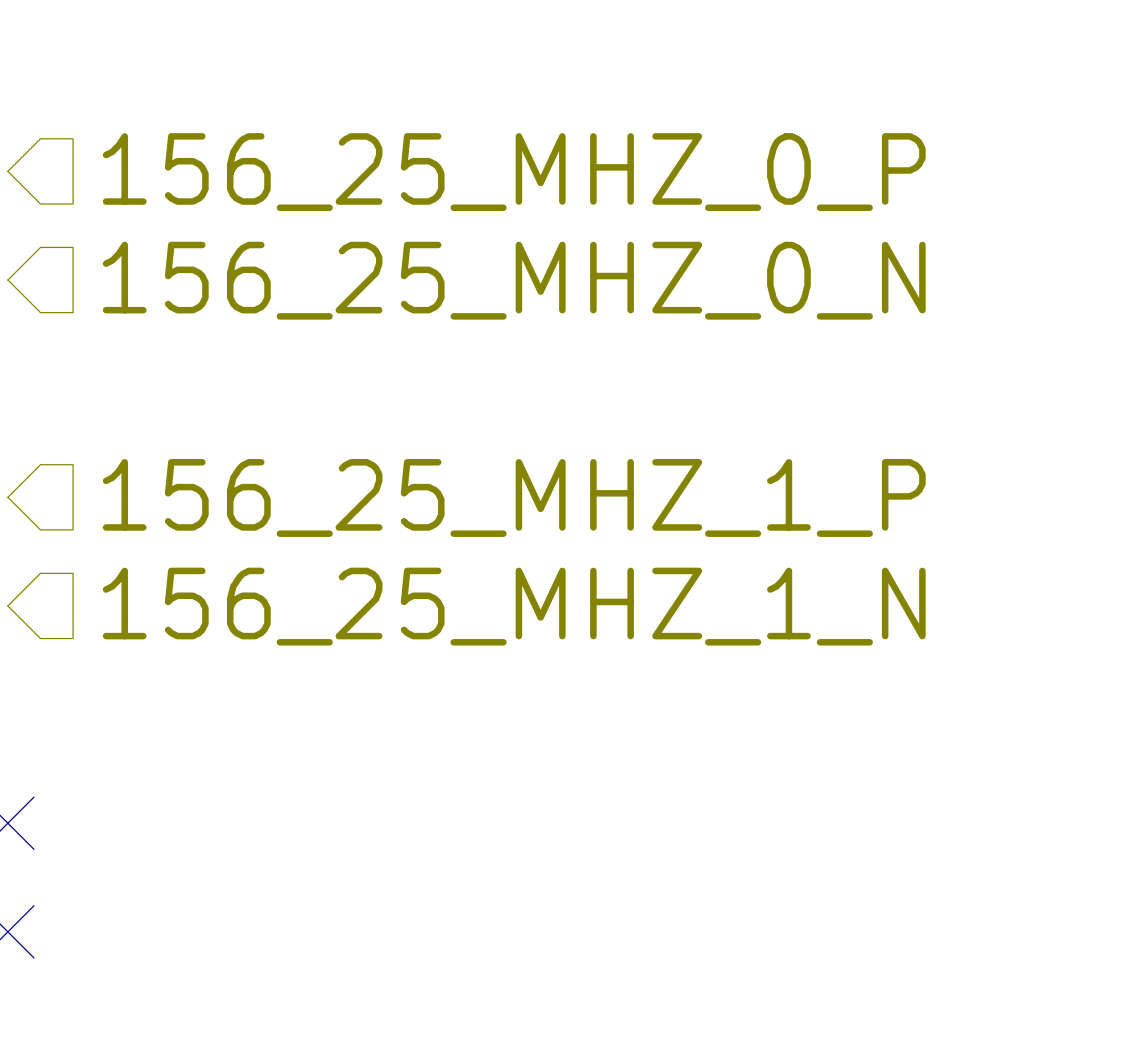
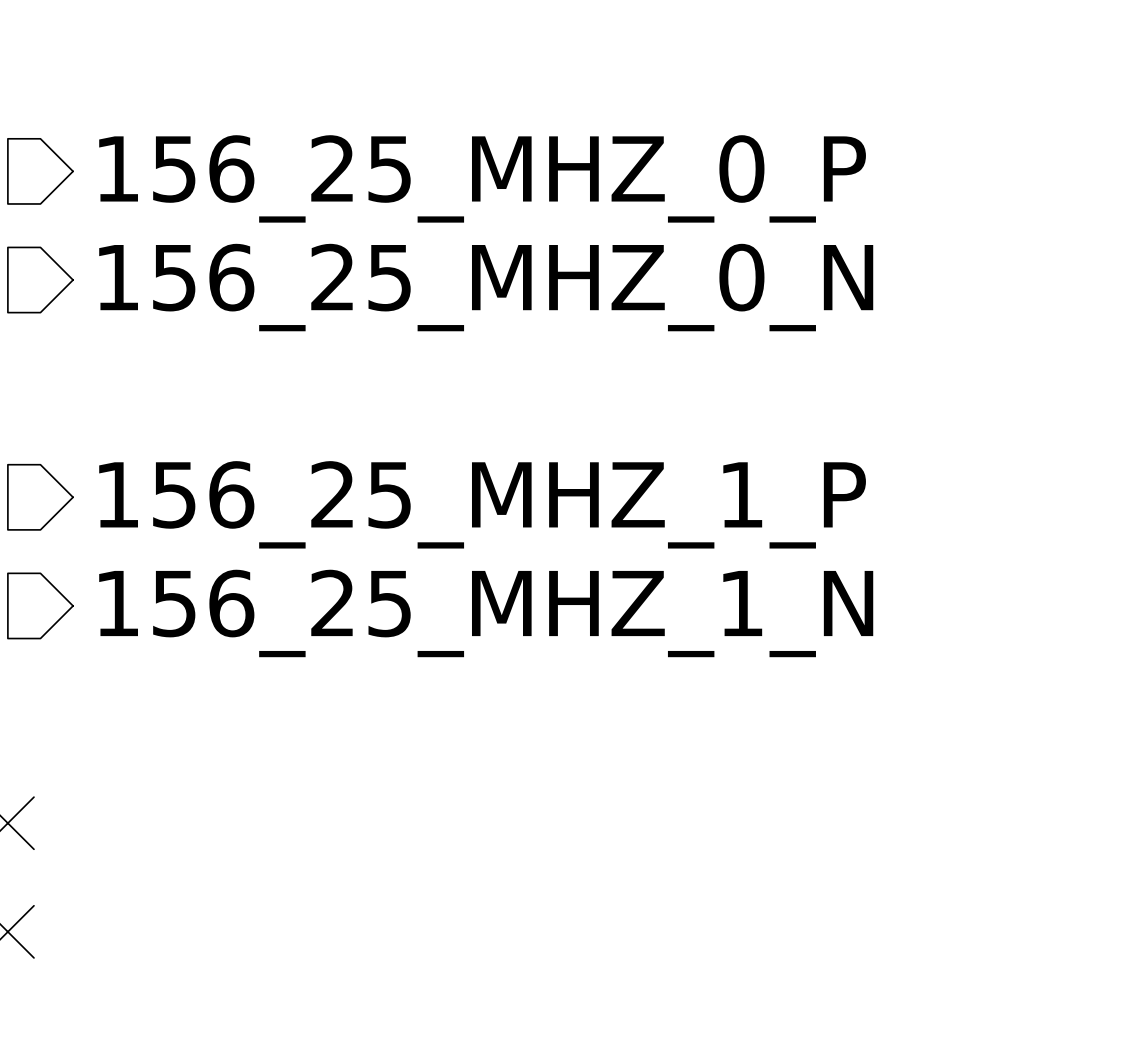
hierarchical label shape: input (514, 172) -> output (482, 178)
hierarchical label shape: input (514, 280) -> output (486, 287)
hierarchical label shape: input (514, 497) -> output (482, 504)
hierarchical label shape: input (514, 606) -> output (486, 613)

